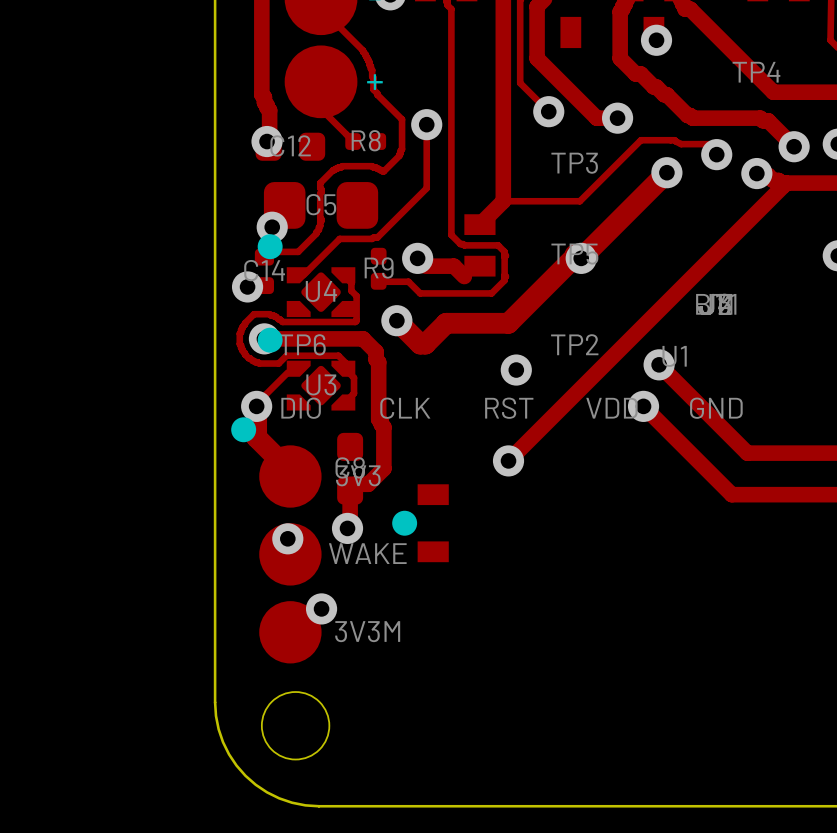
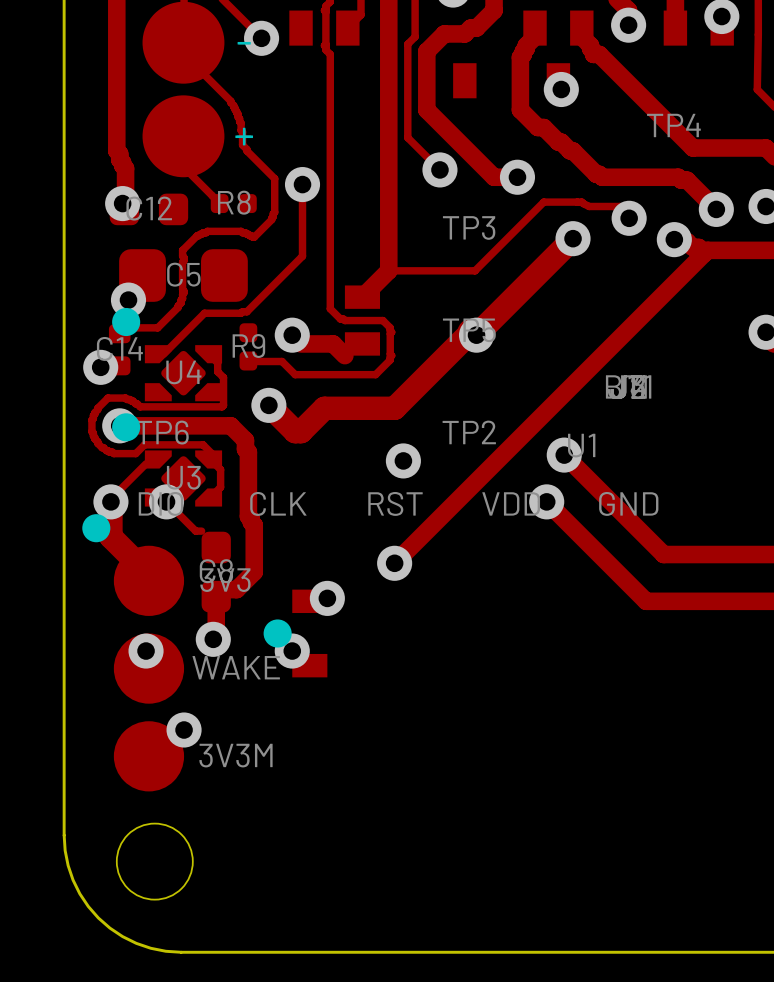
track: none -> (166, 501) (195, 531) (201, 531)
via: none -> (166, 501)
via: none -> (327, 598)
via: none -> (292, 651)

